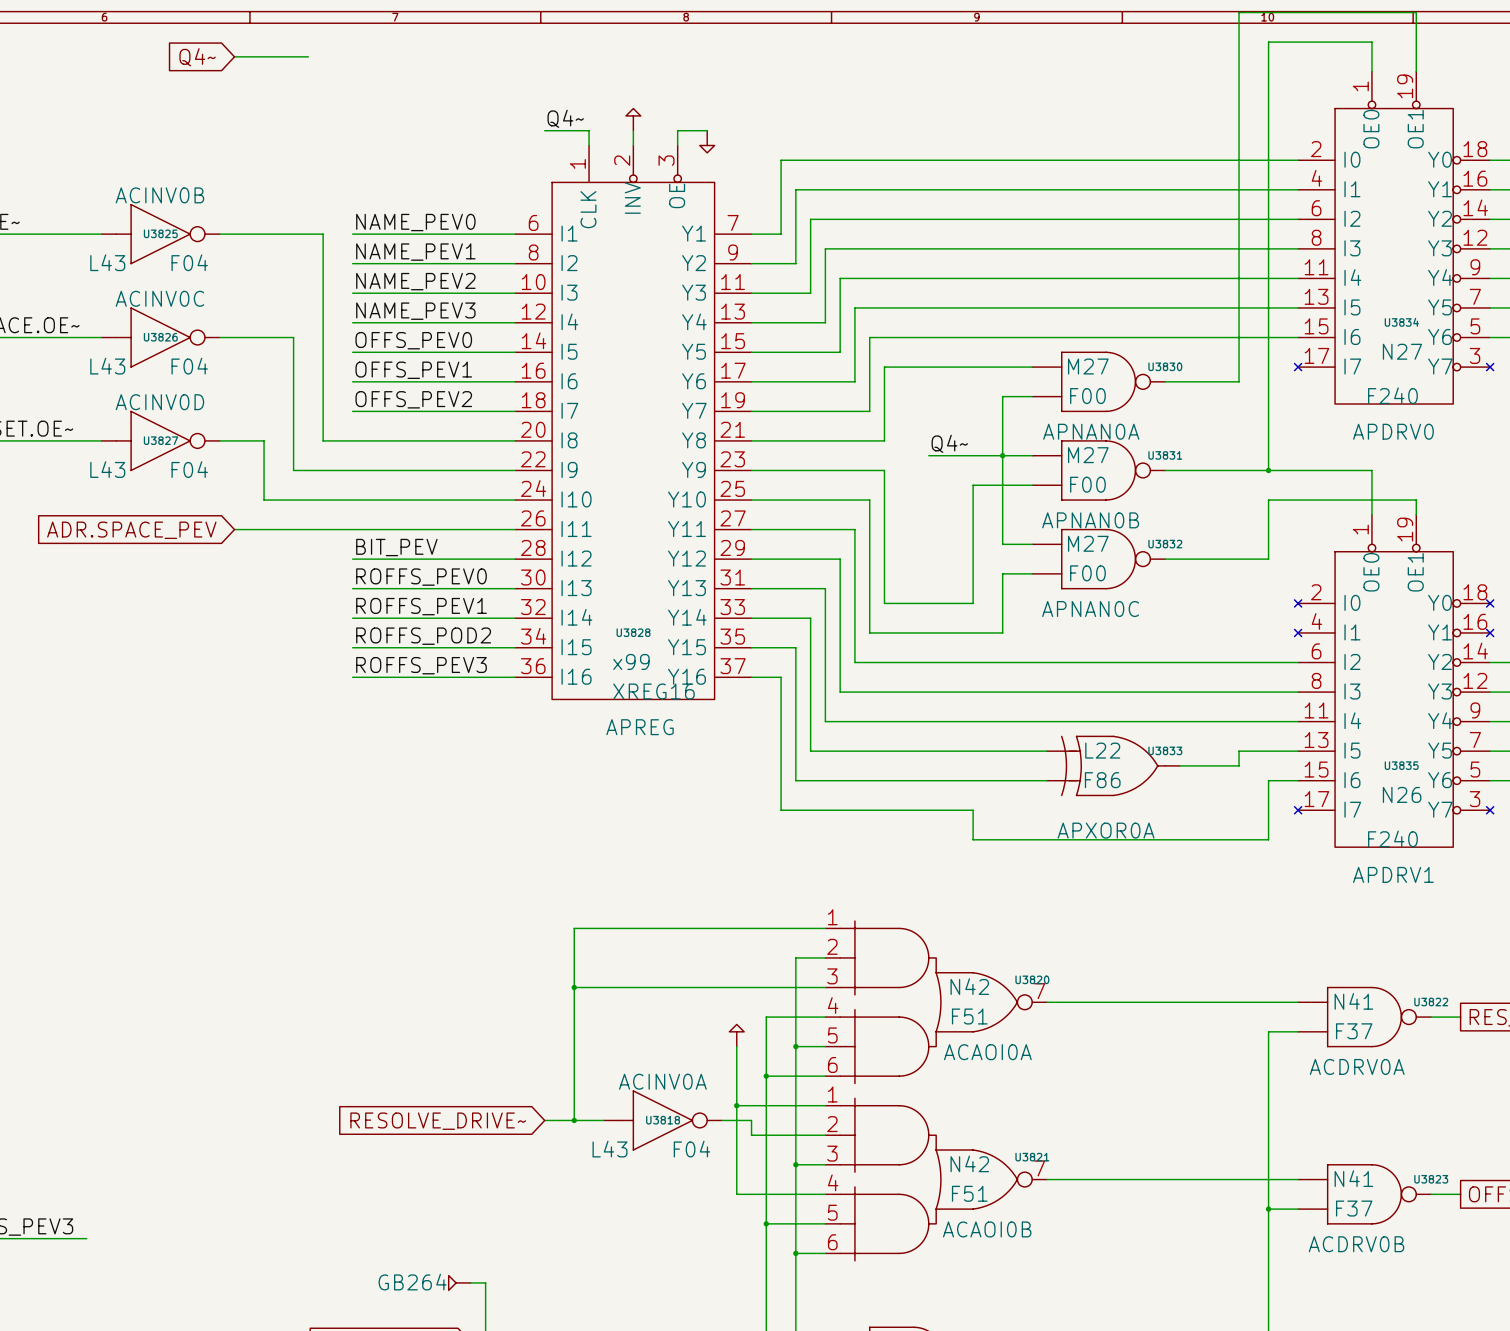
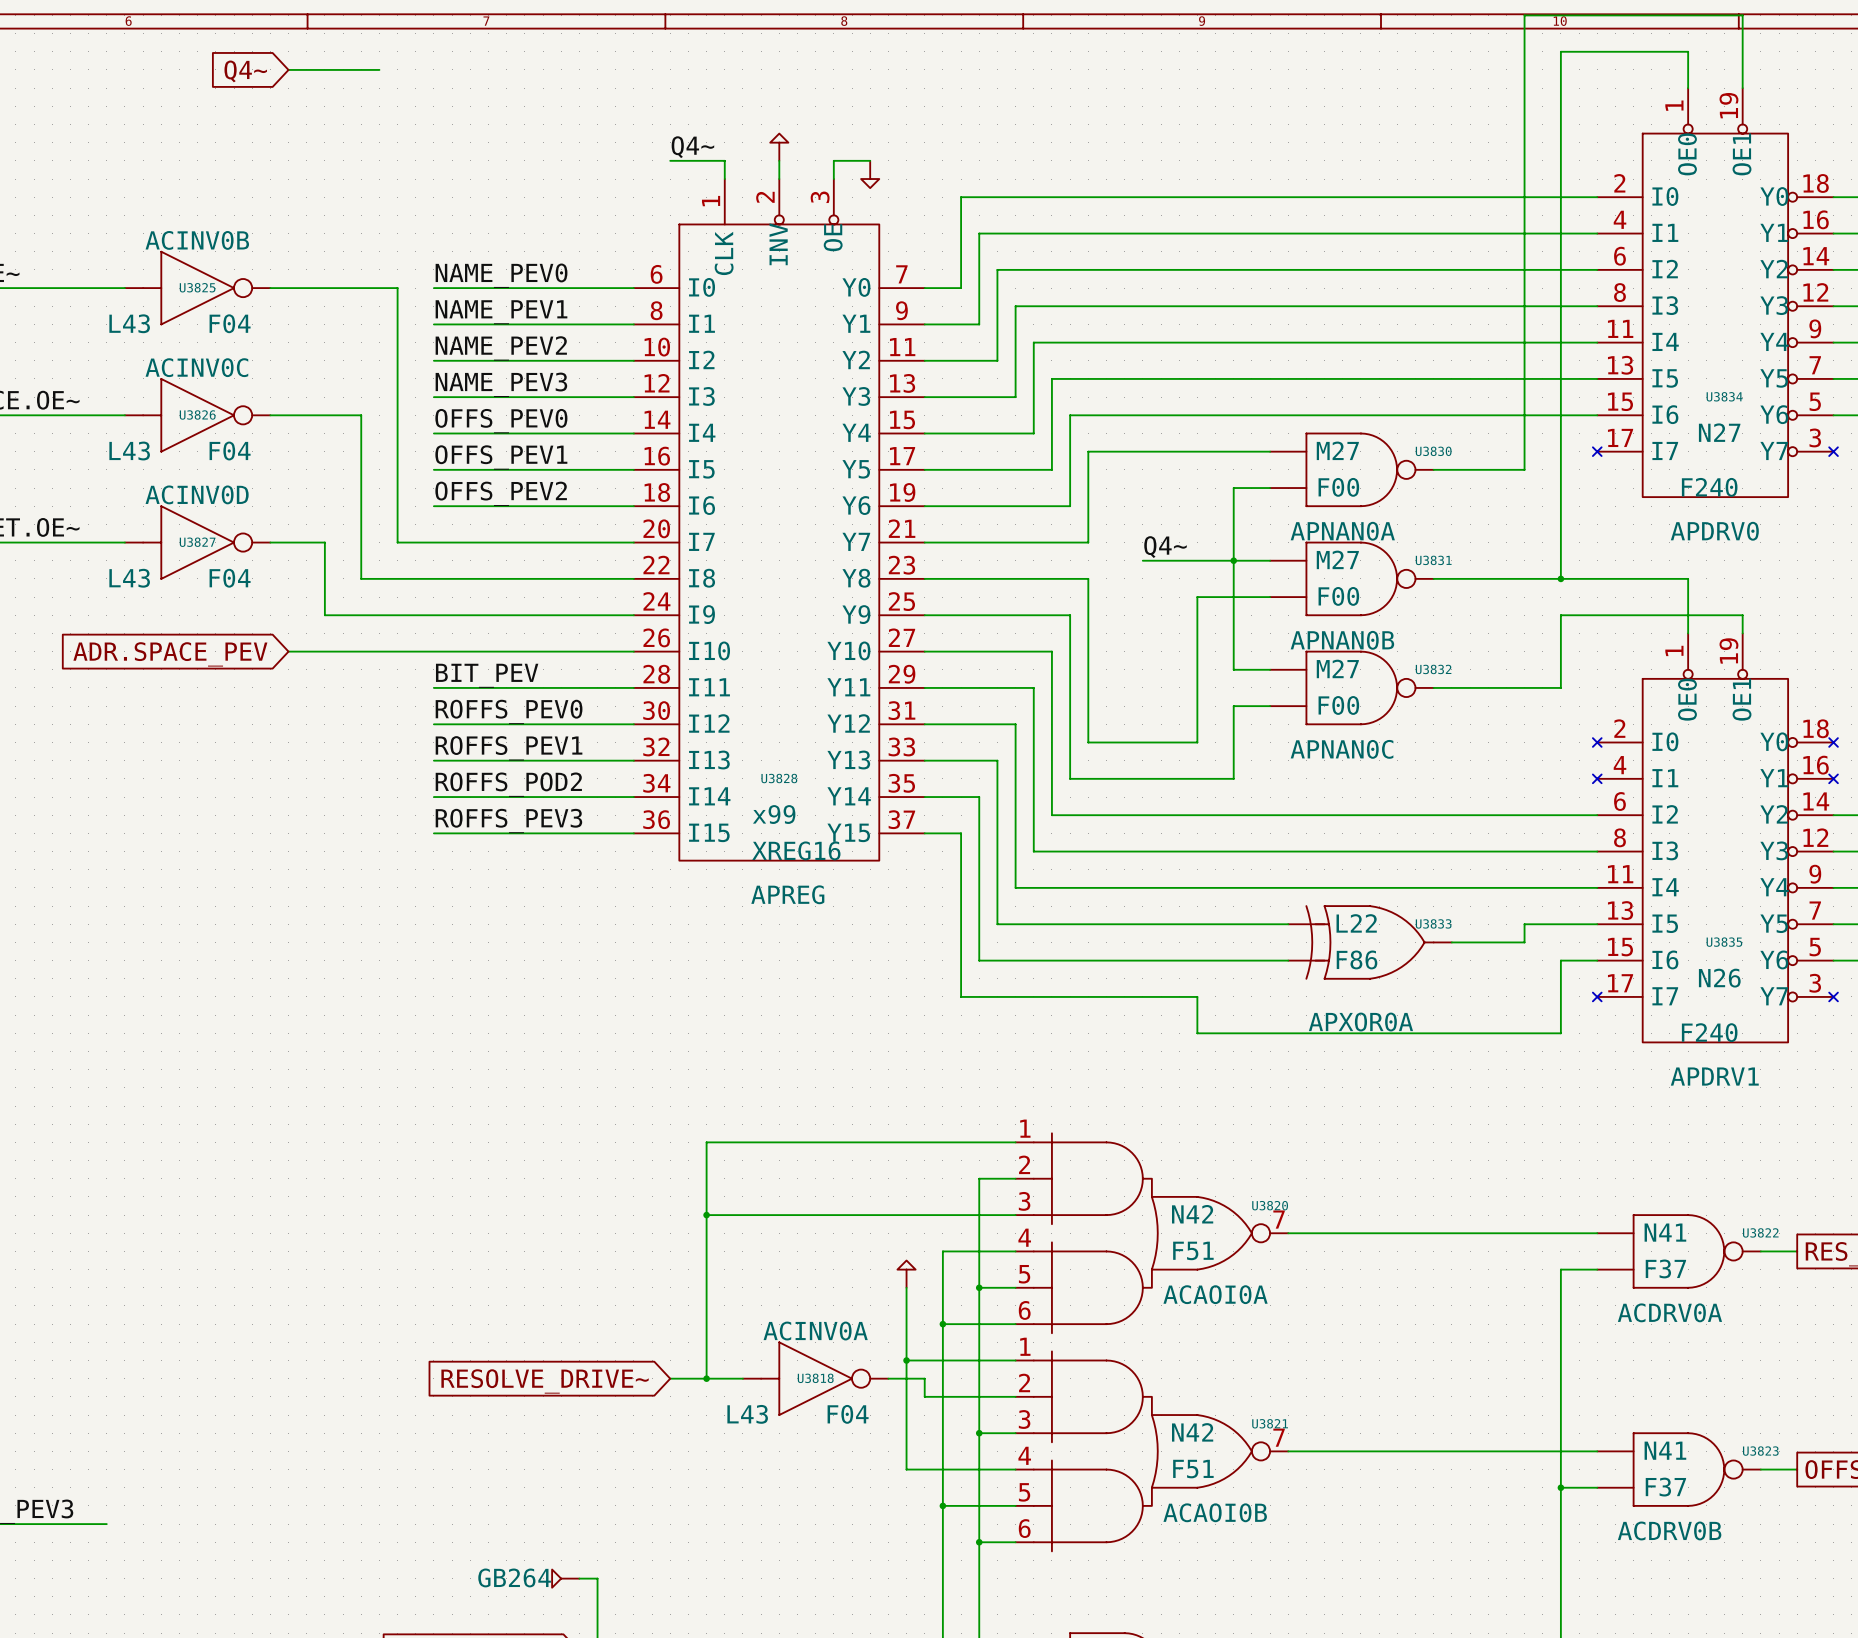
U3828 symbol: [515, 145, 752, 700] -> [633, 179, 925, 861]

